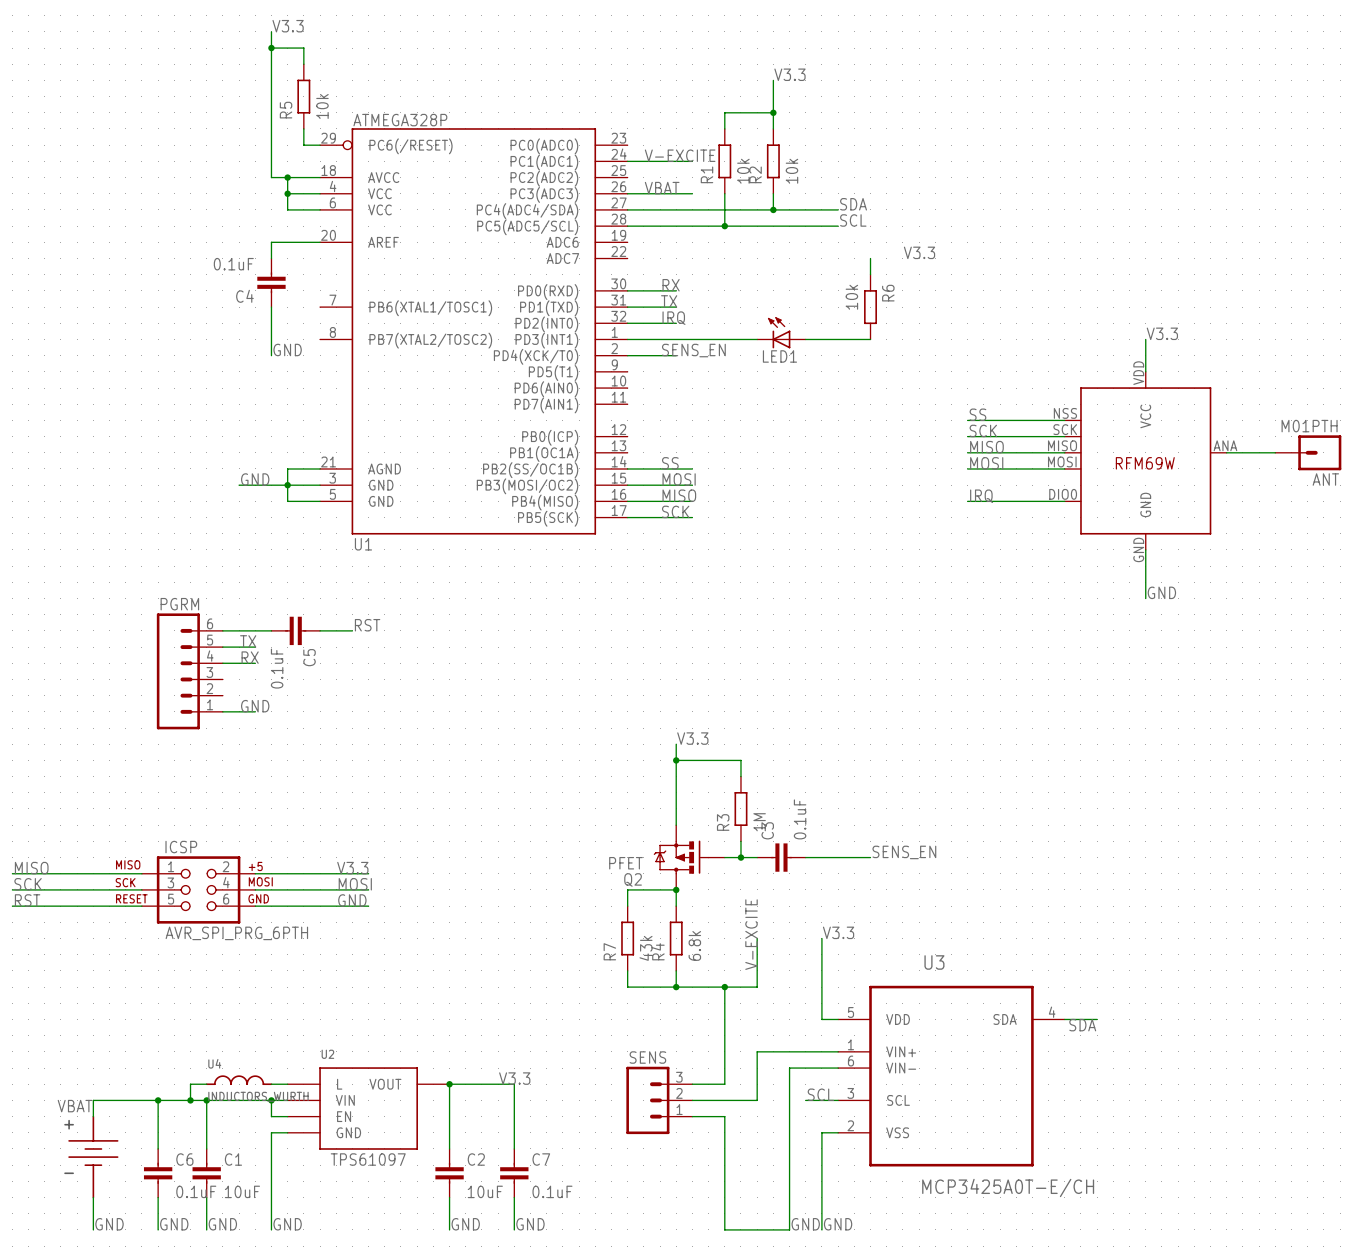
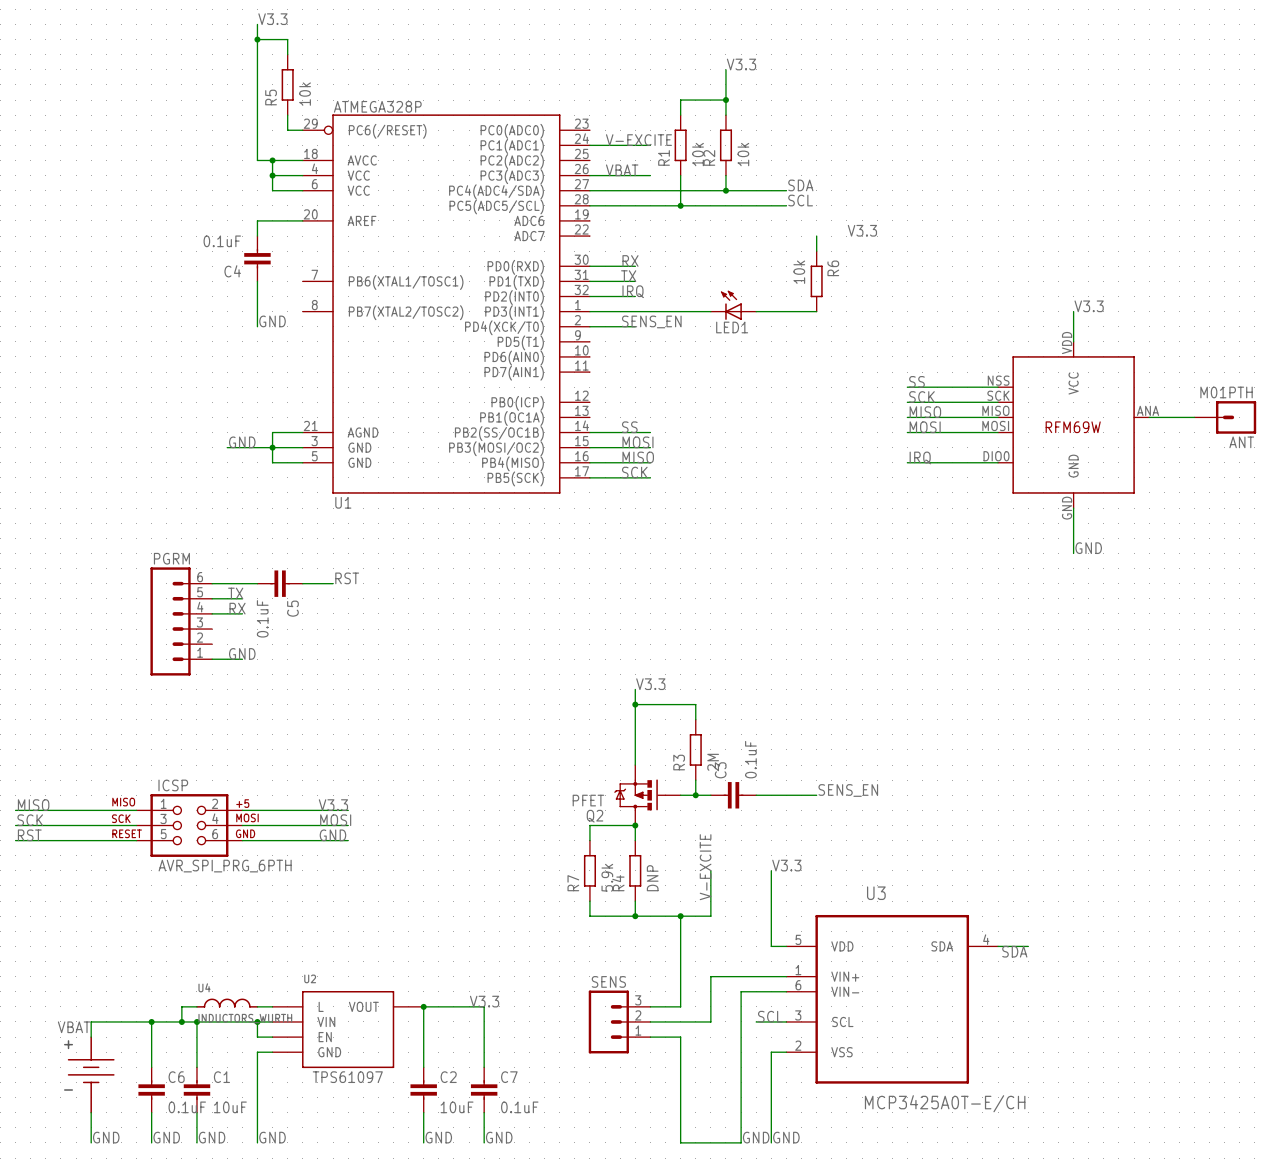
R3 value: 1M (759, 822) -> 2M (713, 762)
R4 value: 6.8k (694, 945) -> DNP (652, 878)
R7 value: 43k (646, 948) -> 5.9k (607, 877)

